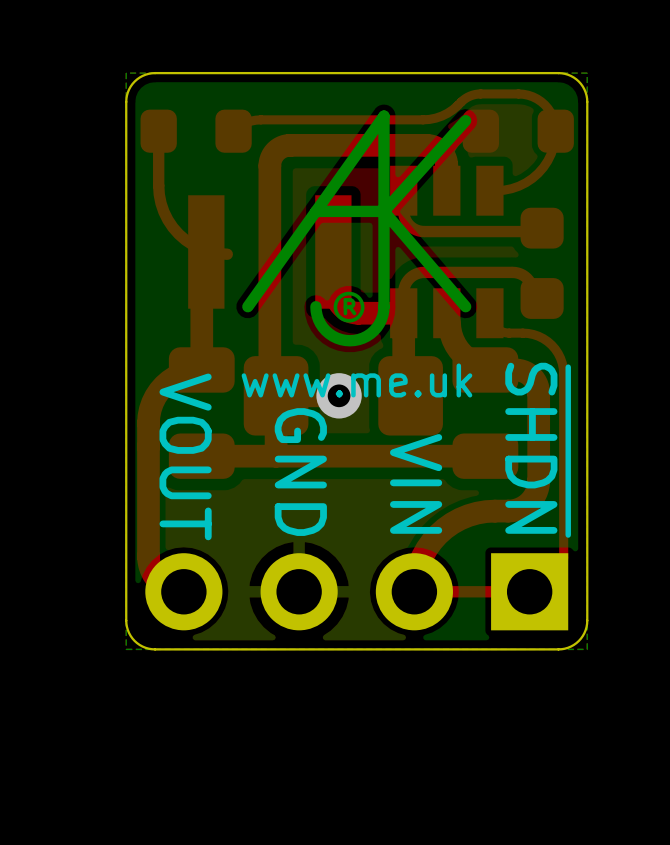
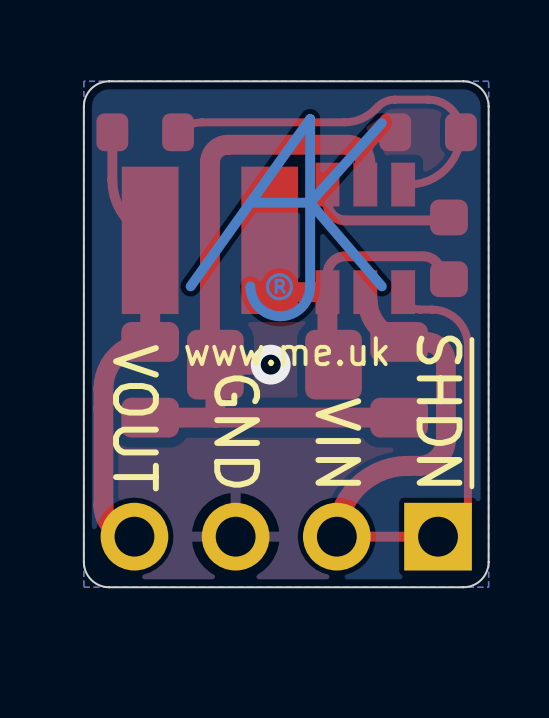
part footprint: [168, 134, 564, 479] -> [121, 134, 468, 438]

